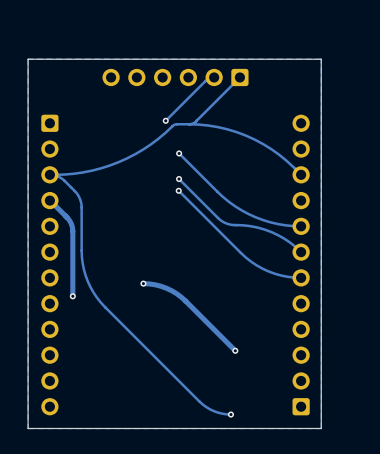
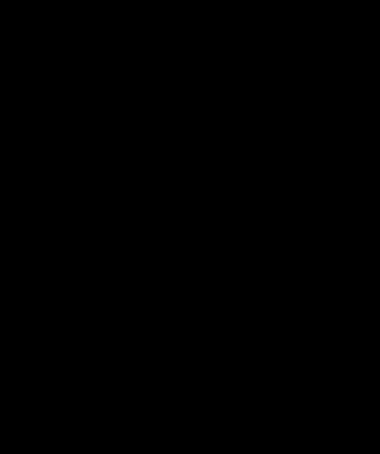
board edge: (321, 59) (28, 59) (28, 428) (321, 428) (321, 59) -> none
part: (175, 77) -> none
track: (214, 77) (206, 80) (165, 120) -> none
track: (239, 77) (196, 121) (188, 124) -> none
via: (165, 120) -> none
track: (188, 124) (173, 125) (143, 149) (109, 165) (82, 172) (49, 174) (63, 179) (79, 198) (83, 269) (90, 286) (105, 307) -> none
track: (188, 124) (217, 127) (245, 135) (271, 149) (301, 174) (295, 172) -> none
track: (179, 153) (222, 196) (241, 210) (270, 222) (301, 226) -> none
via: (179, 153) -> none
track: (179, 179) (223, 222) (257, 227) (271, 231) (289, 242) (301, 252) -> none
via: (179, 179) -> none
track: (178, 190) (251, 261) (274, 273) (301, 277) -> none
via: (178, 190) -> none
track: (49, 200) (68, 218) (72, 227) (72, 296) -> none
part: (49, 265) -> none
part: (301, 265) -> none
track: (143, 283) (160, 286) (176, 293) (235, 350) -> none
via: (143, 283) -> none
via: (72, 296) -> none
track: (105, 307) (202, 404) (213, 411) (230, 414) -> none
via: (235, 350) -> none
via: (230, 414) -> none

